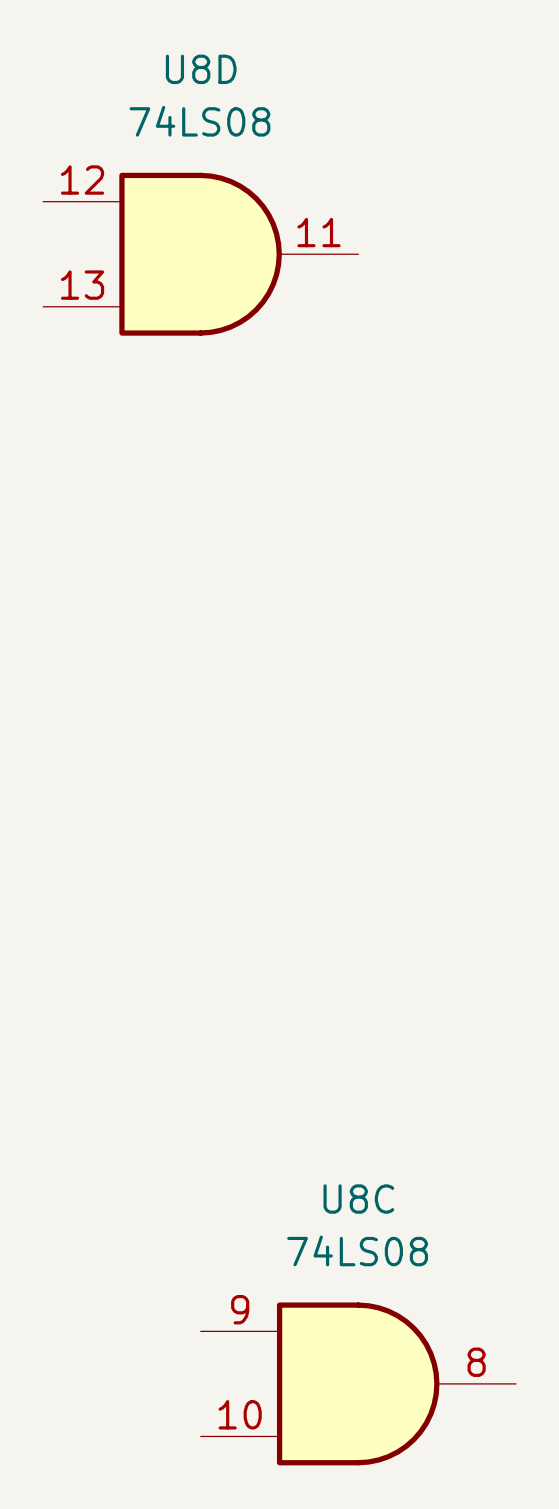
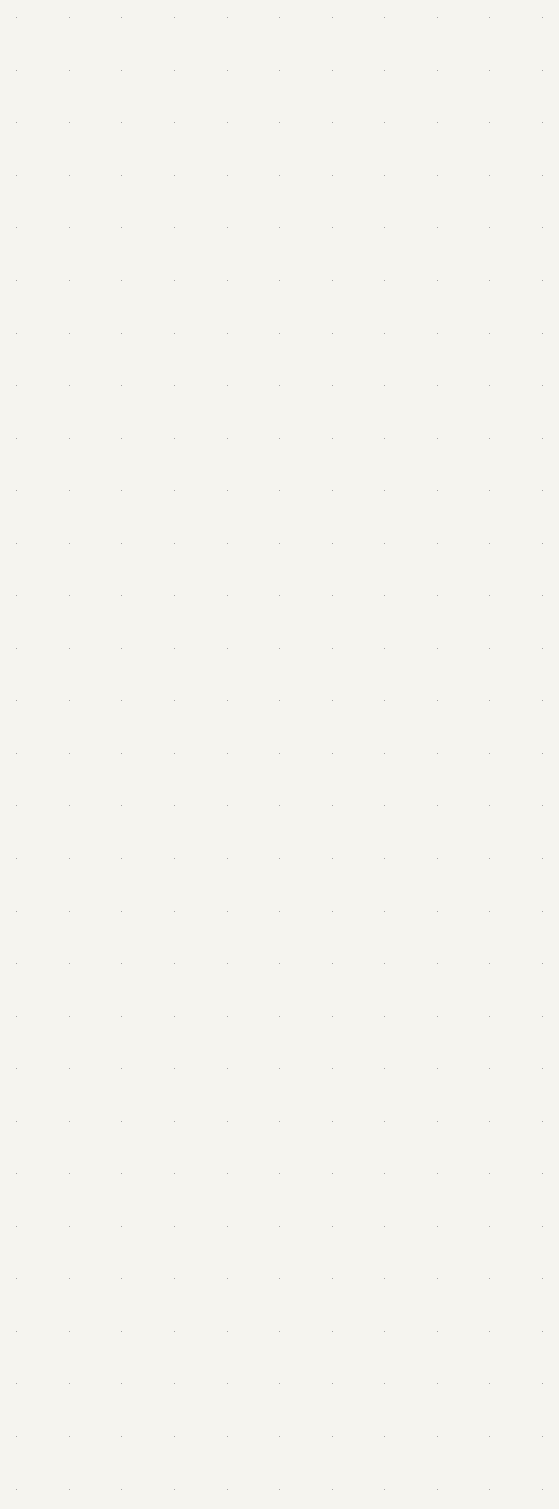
U8D: 74LS08 (200, 254) -> none
U8C: 74LS08 (358, 1383) -> none

